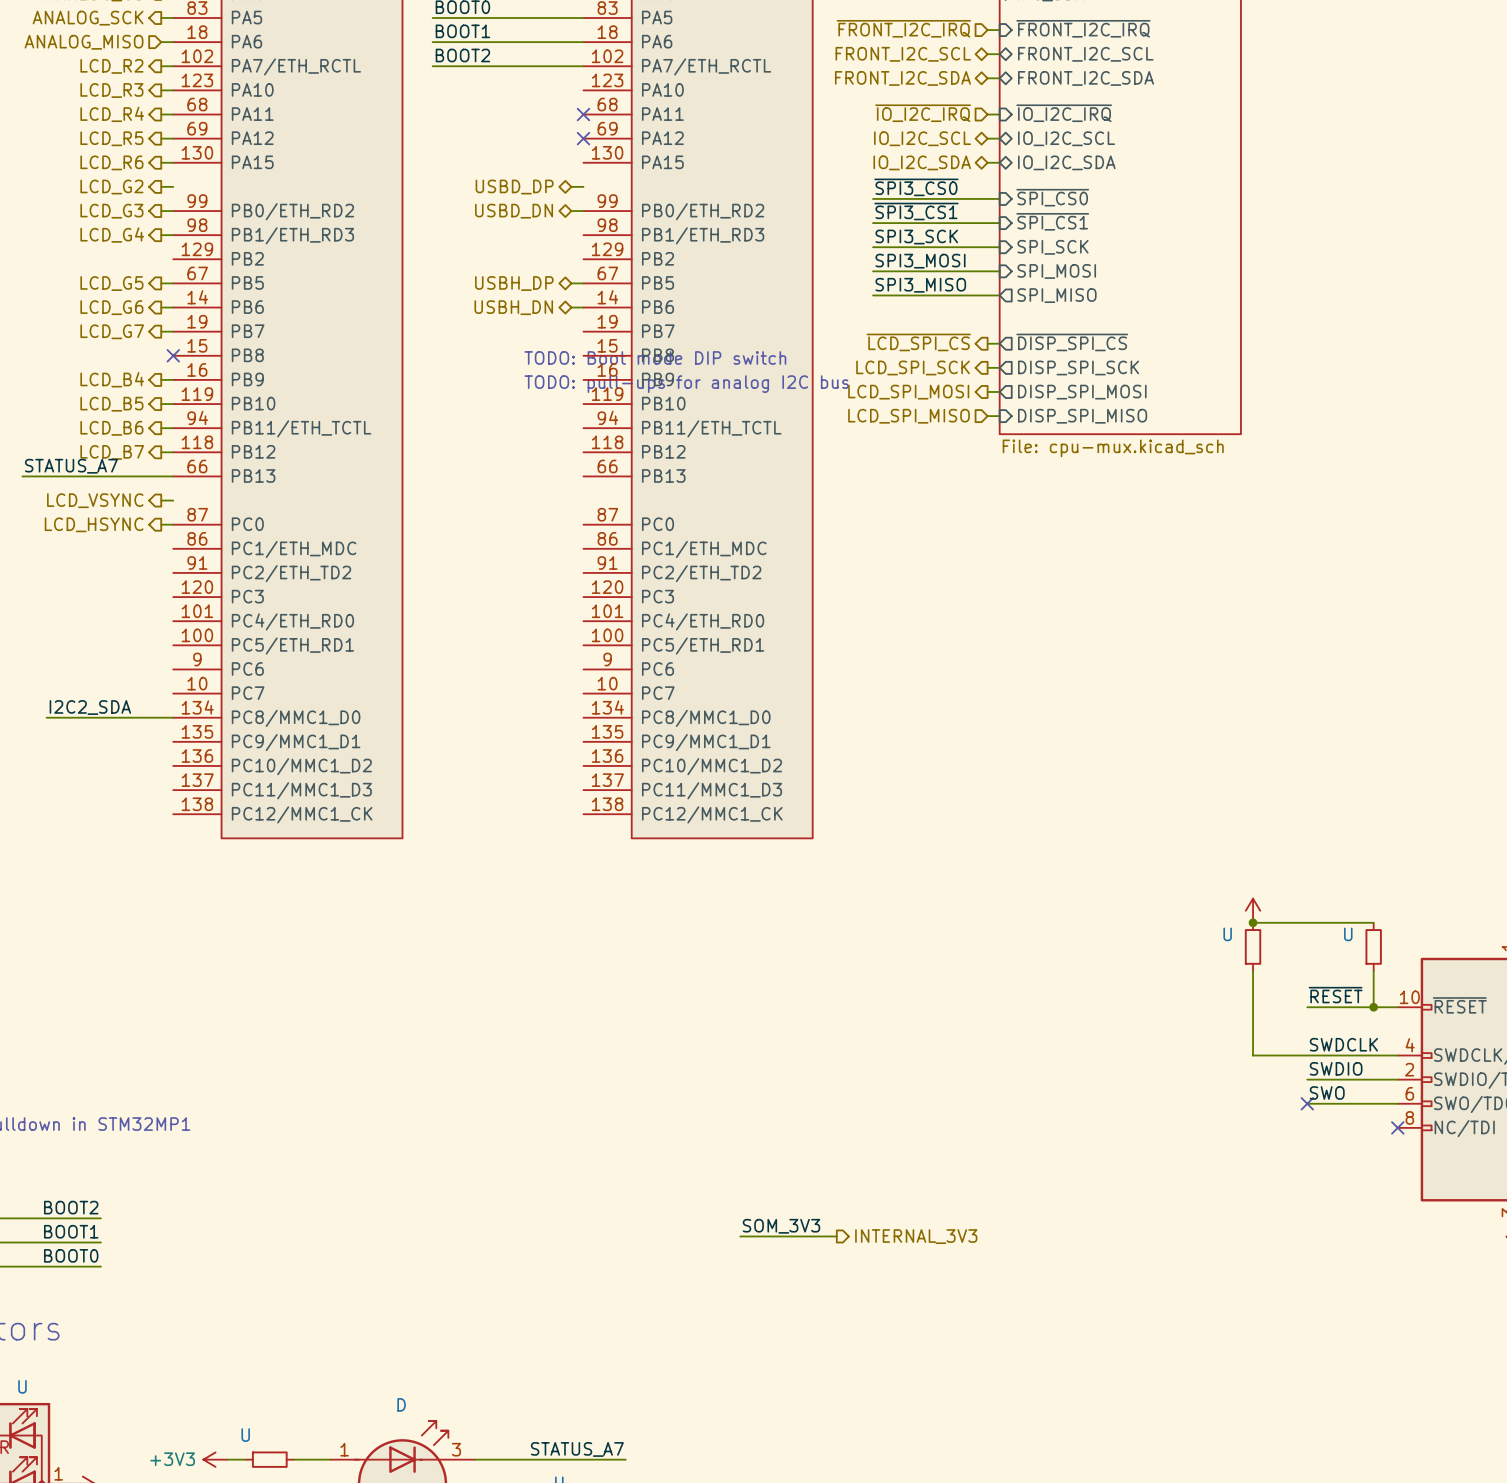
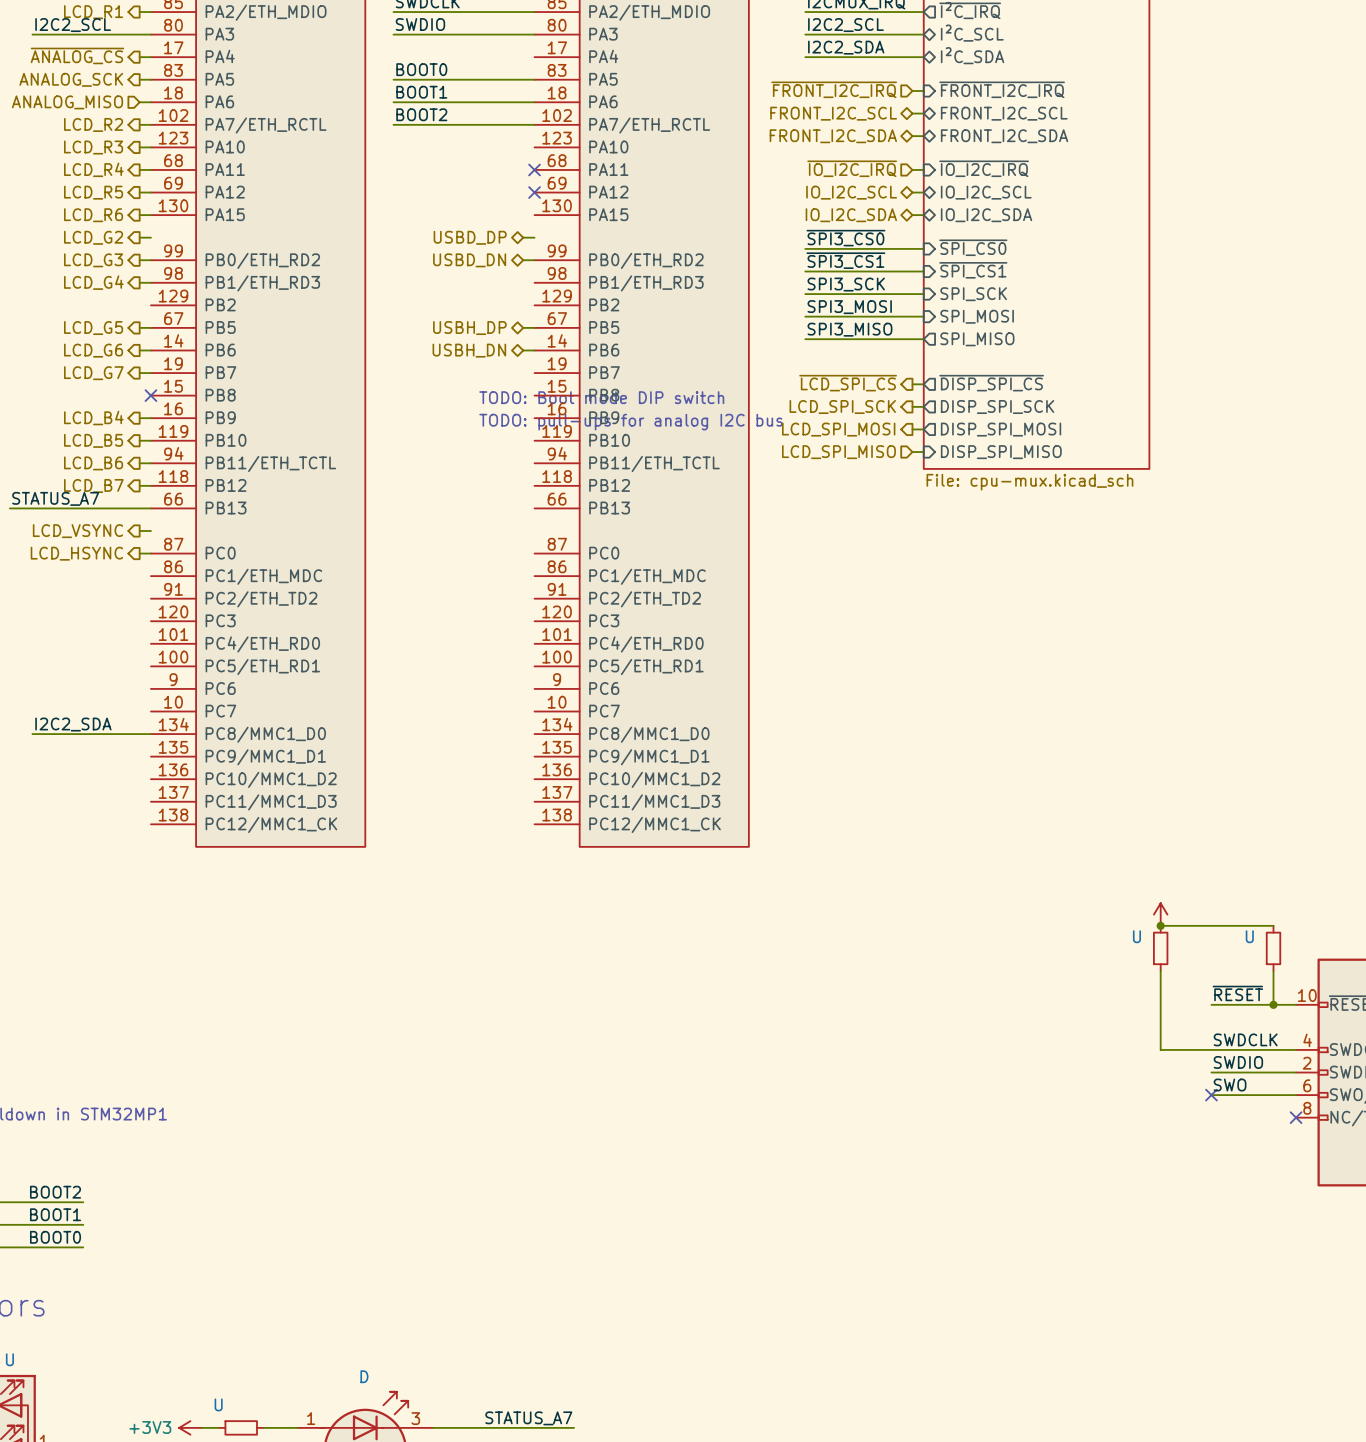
label: SOM_3V3 (781, 1226) -> none
wire: (740, 1236) (836, 1236) -> none
hierarchical label: INTERNAL_3V3 (916, 1236) -> none

